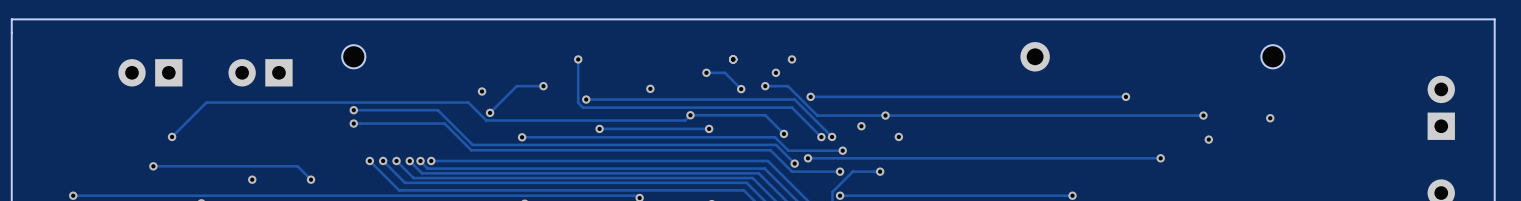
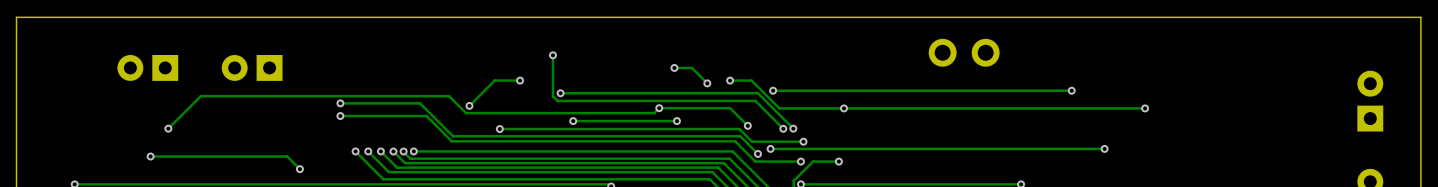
part: (353, 56) -> none
part: none -> (942, 52)
part: (1272, 56) -> none
via: (733, 59) -> none
via: (791, 59) -> none
via: (775, 72) -> none
via: (650, 88) -> none
via: (482, 91) -> none
via: (1270, 118) -> none
via: (861, 126) -> none
via: (898, 136) -> none
via: (1208, 139) -> none
via: (252, 179) -> none

